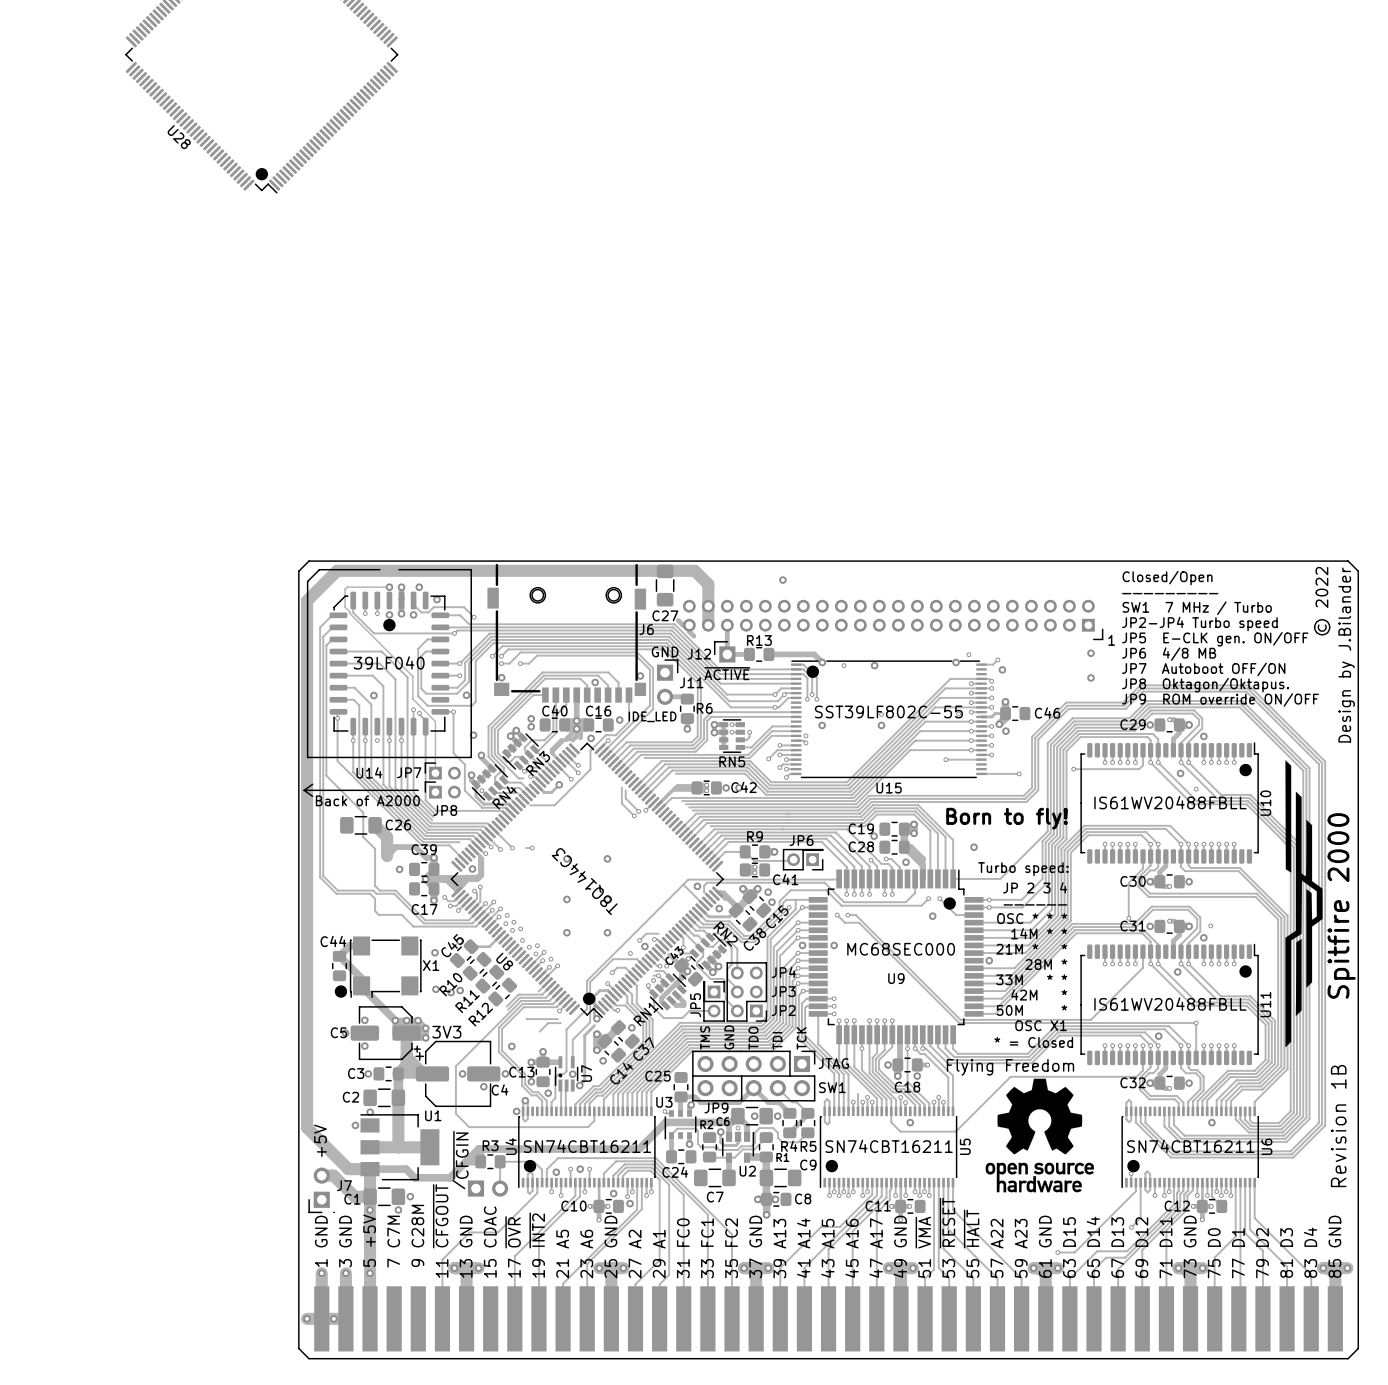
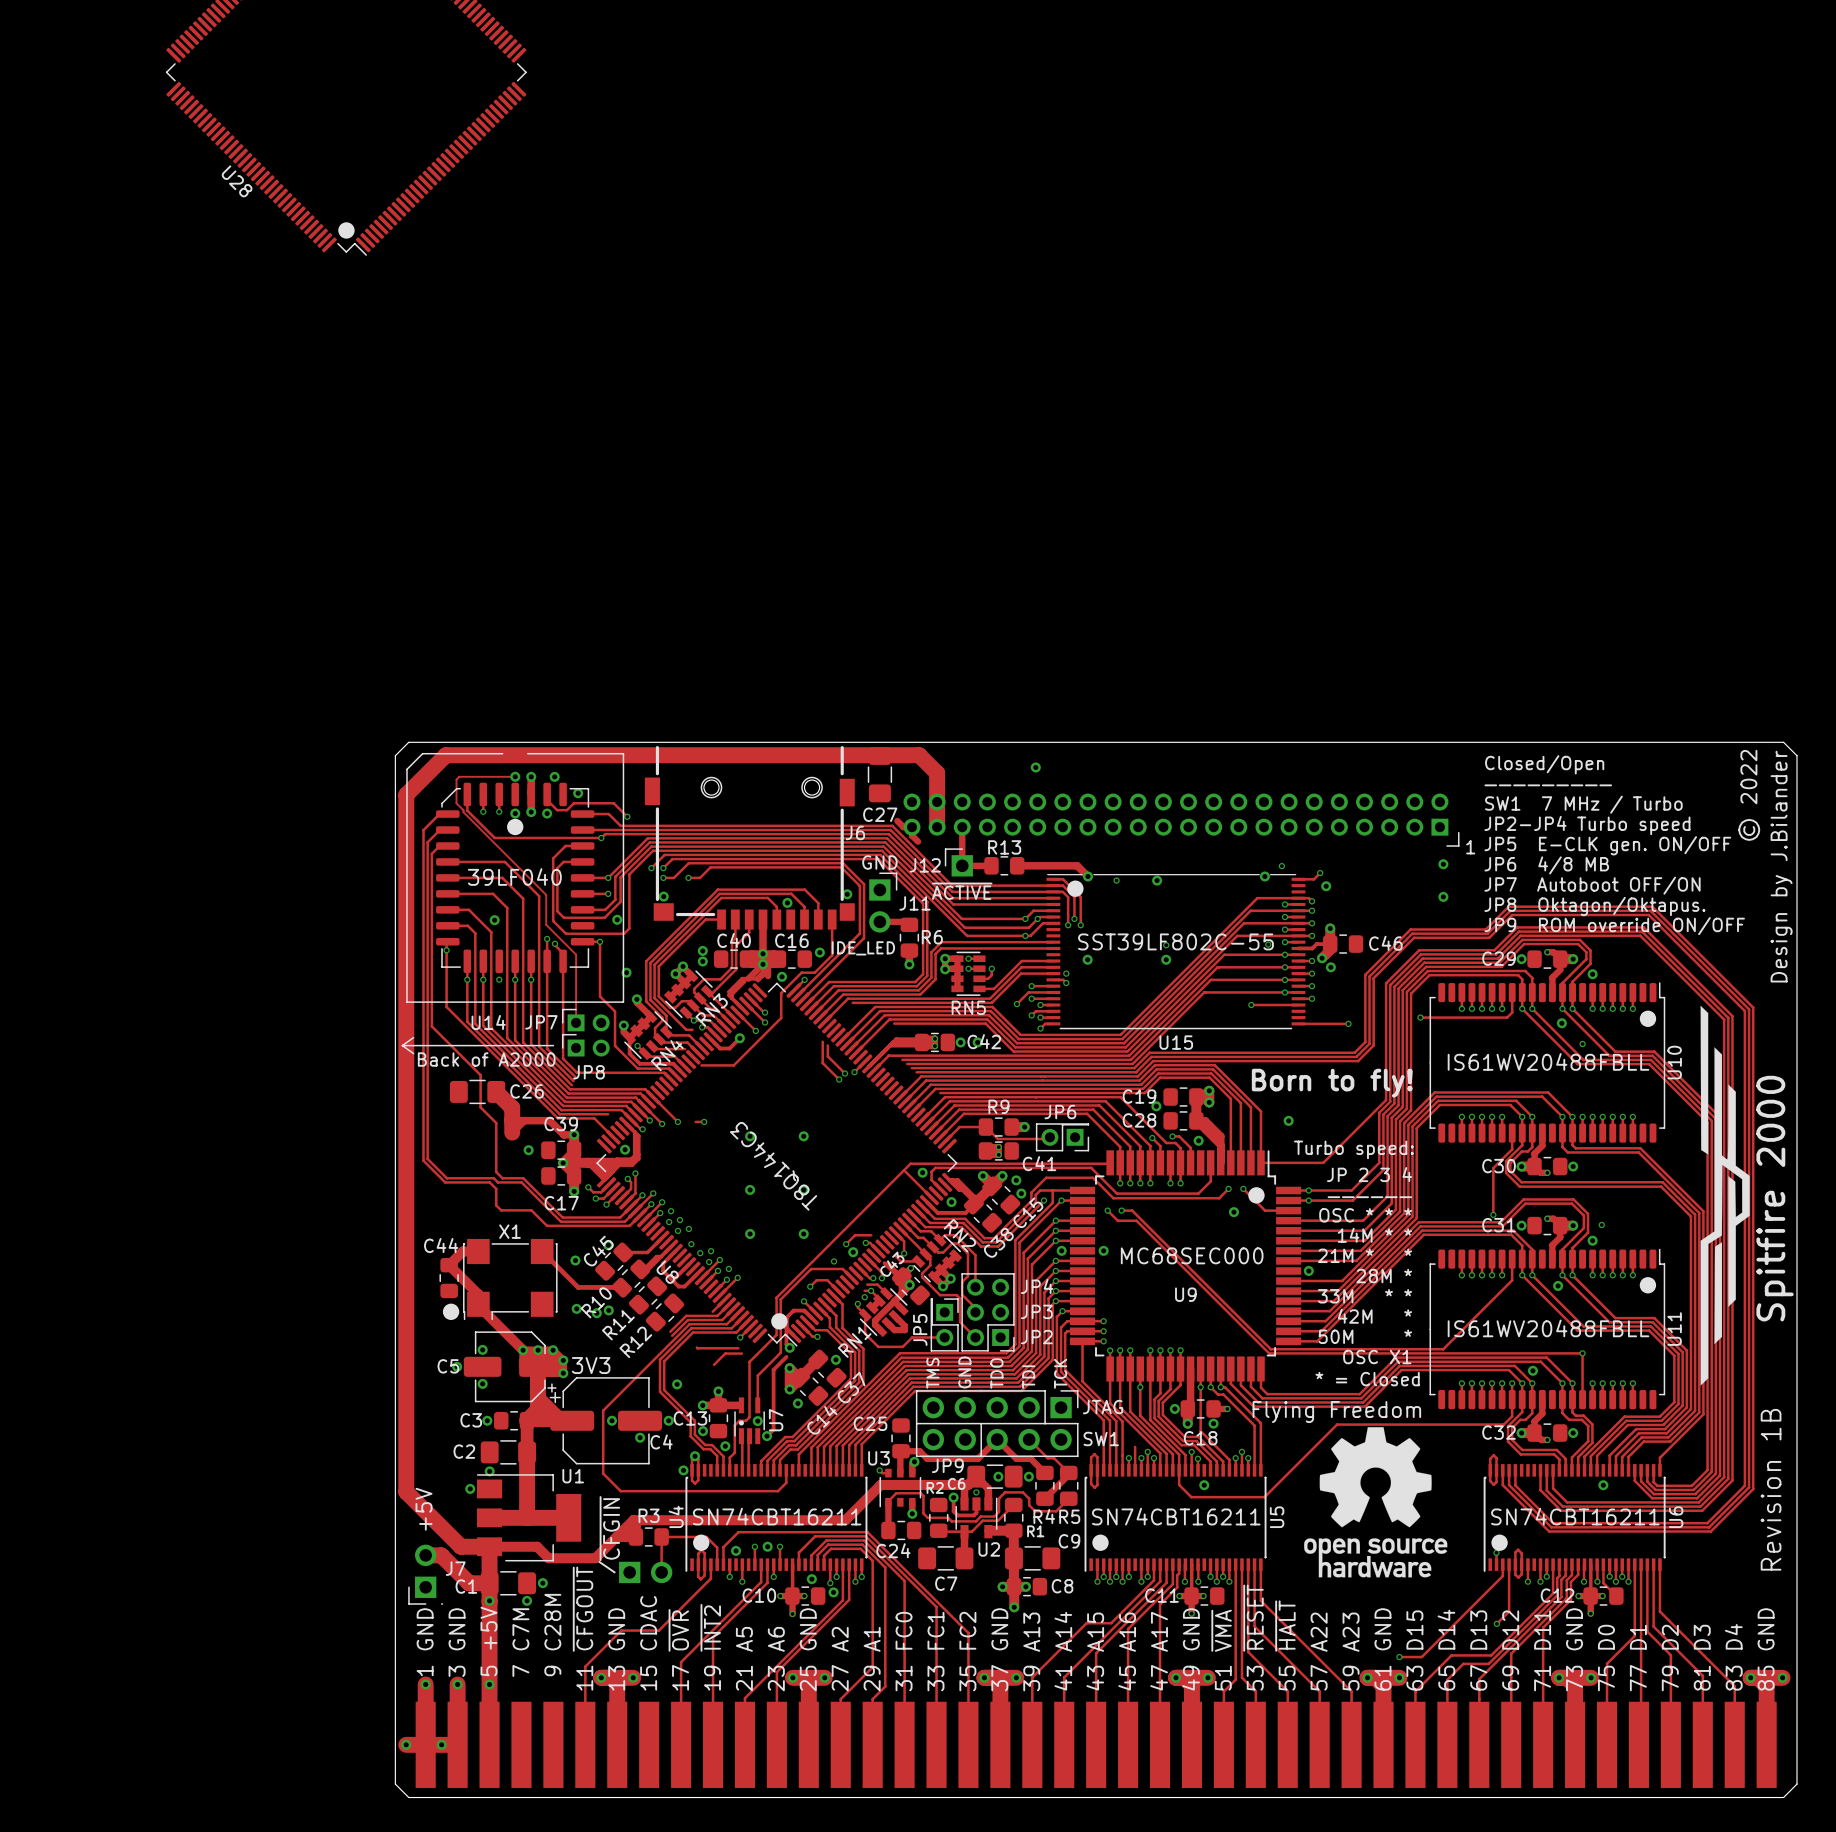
track: none -> (671, 1246) (648, 1269) (640, 1269)
track: none -> (542, 1251) (578, 1287) (622, 1287)
track: none -> (675, 1251) (663, 1263) (663, 1271) (678, 1286) (684, 1286) (697, 1273)
track: none -> (661, 1256) (656, 1256) (643, 1269)
track: none -> (688, 1264) (674, 1279) (671, 1279)
X1 name position: X1 (431, 965) -> X1 (510, 1231)

